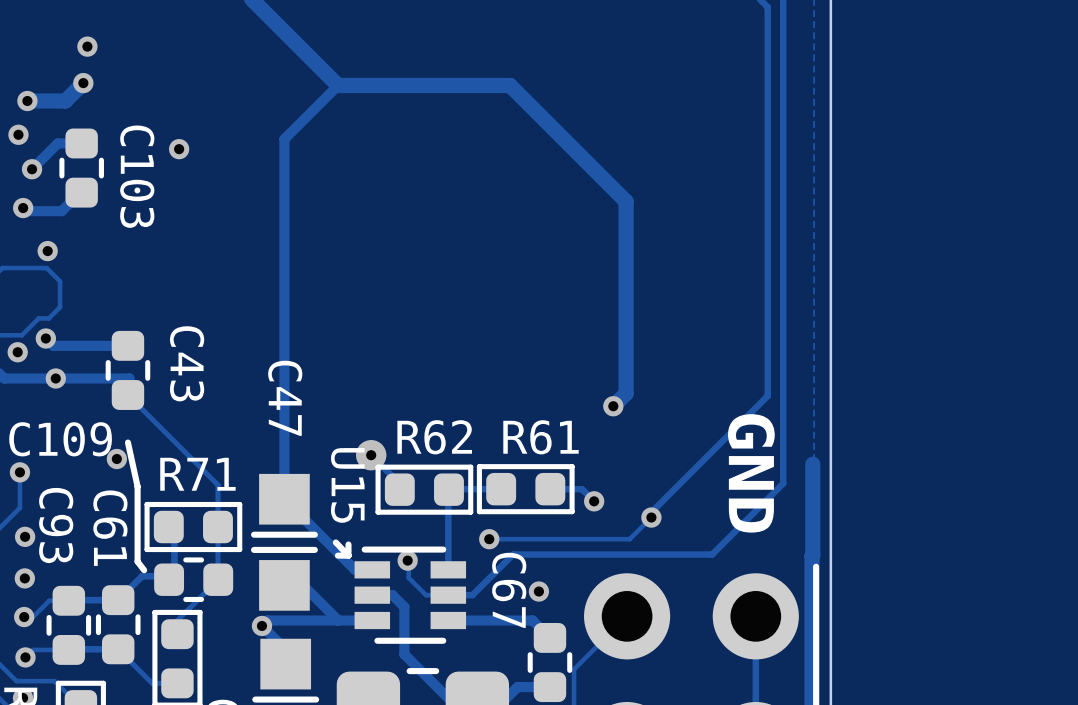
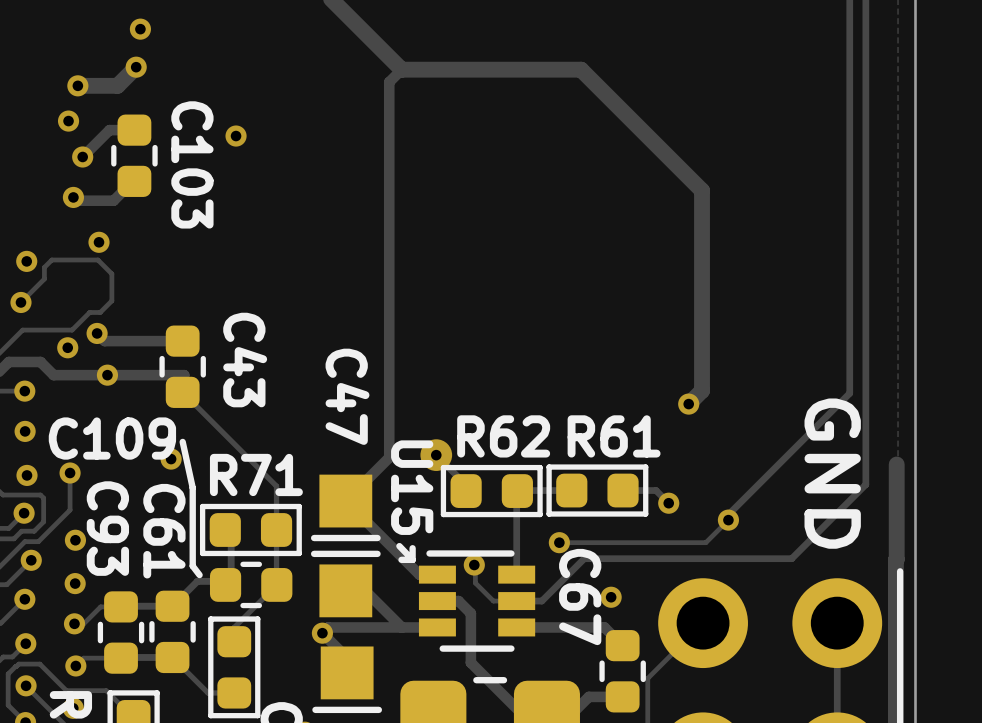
track: (326, 97) (284, 139) (284, 499) -> (389, 82) (389, 457) (345, 501)

